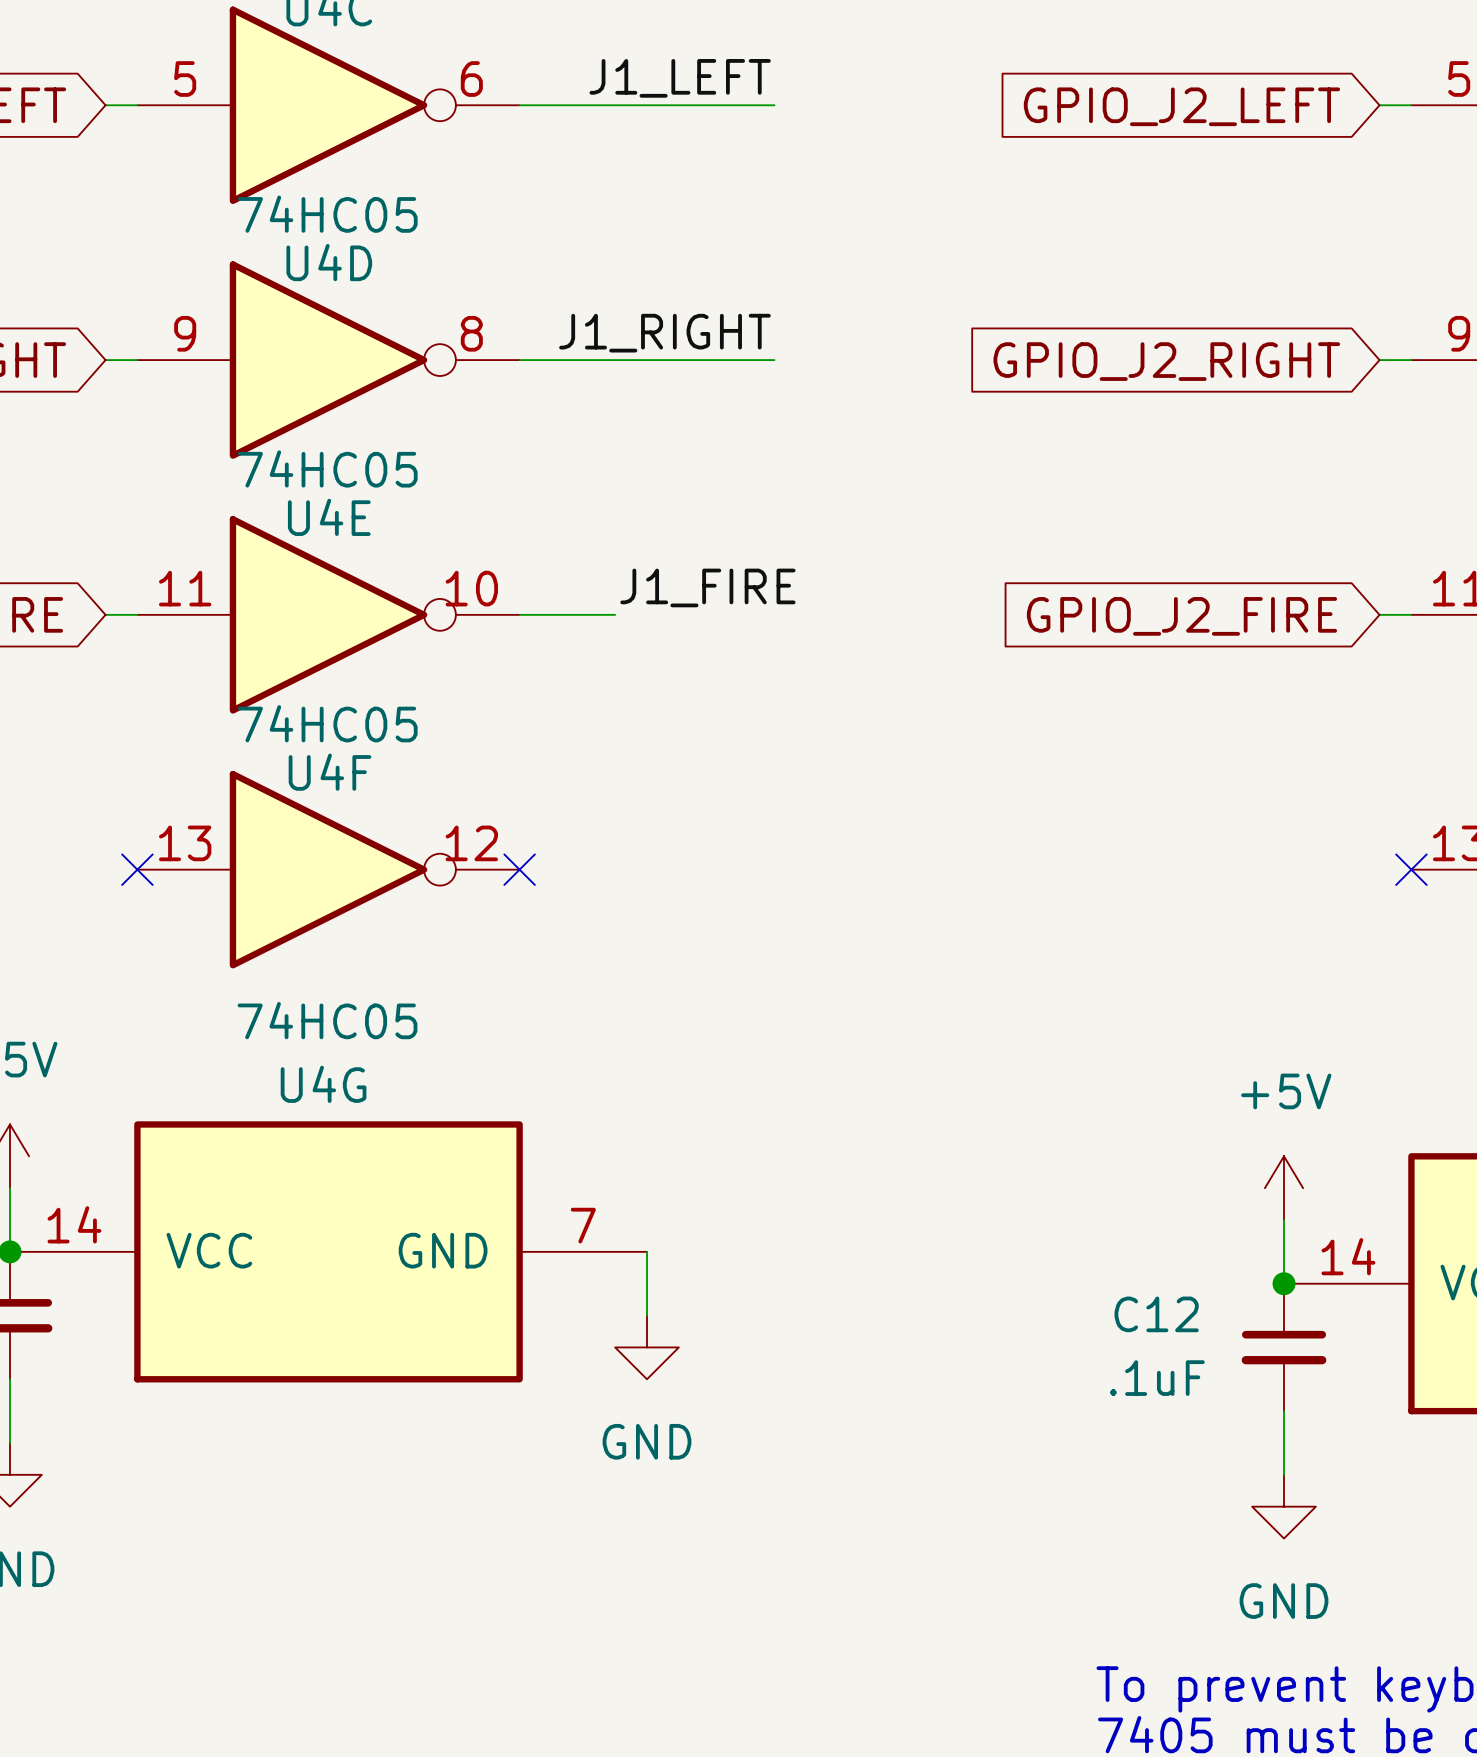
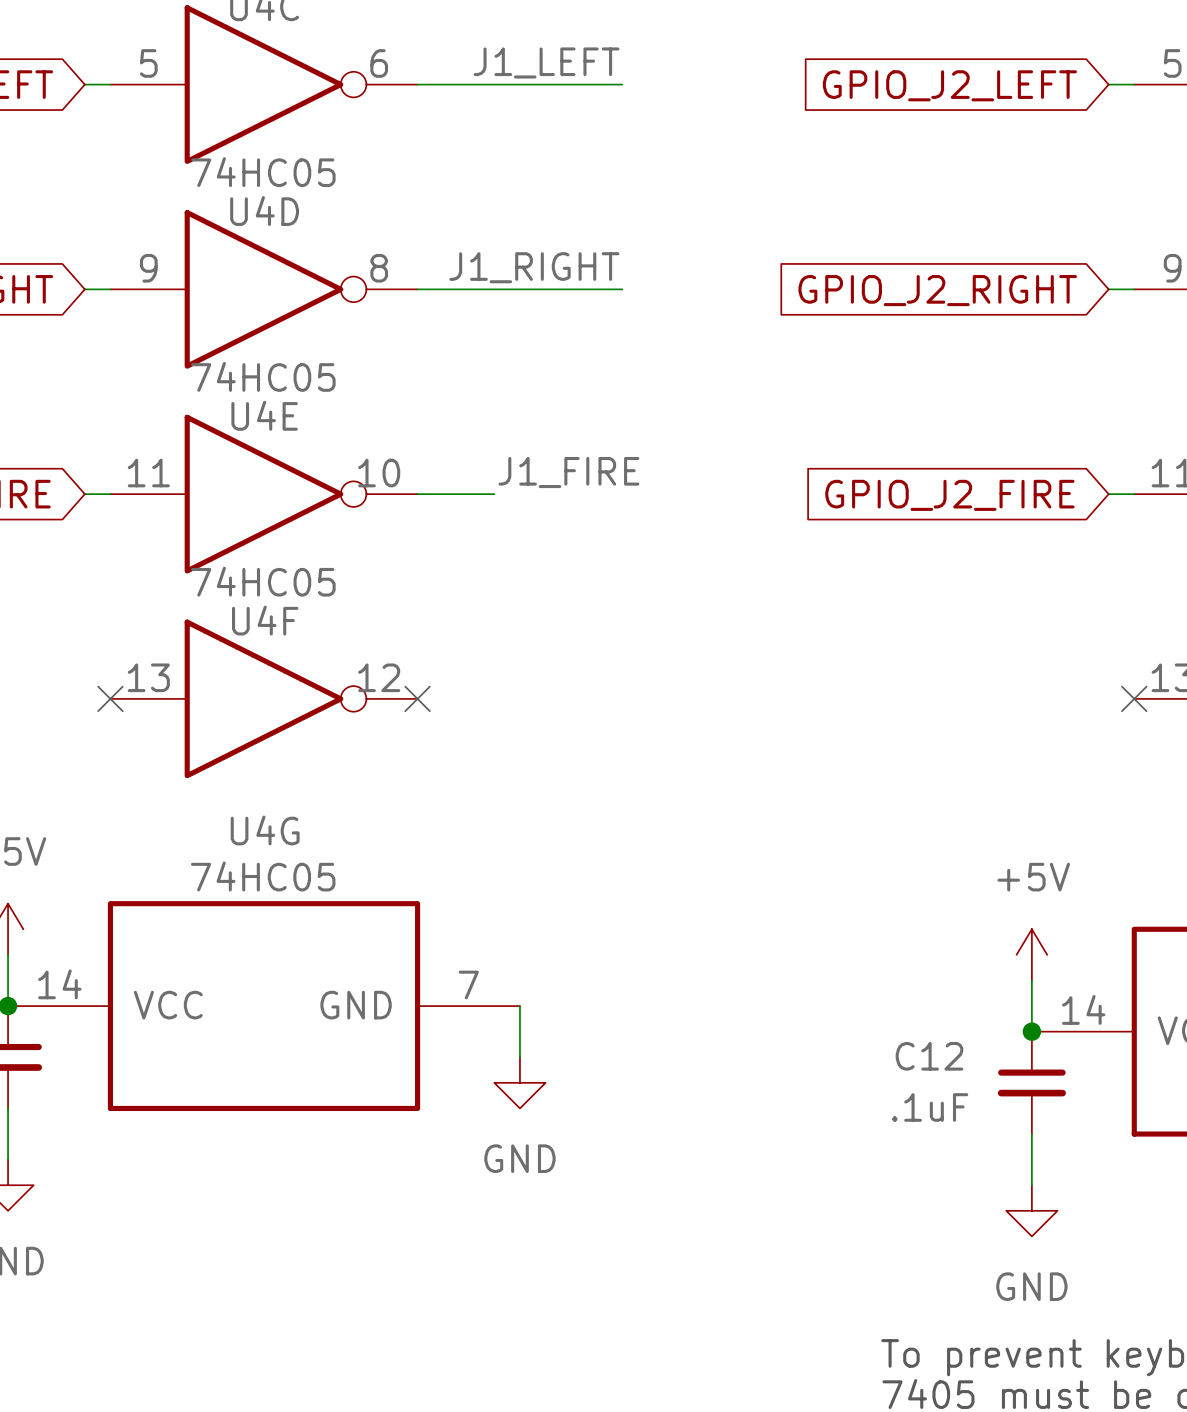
U4G value position: 74HC05 (327, 1020) -> 74HC05 (263, 876)
U4G name position: U4G (323, 1084) -> U4G (265, 830)

